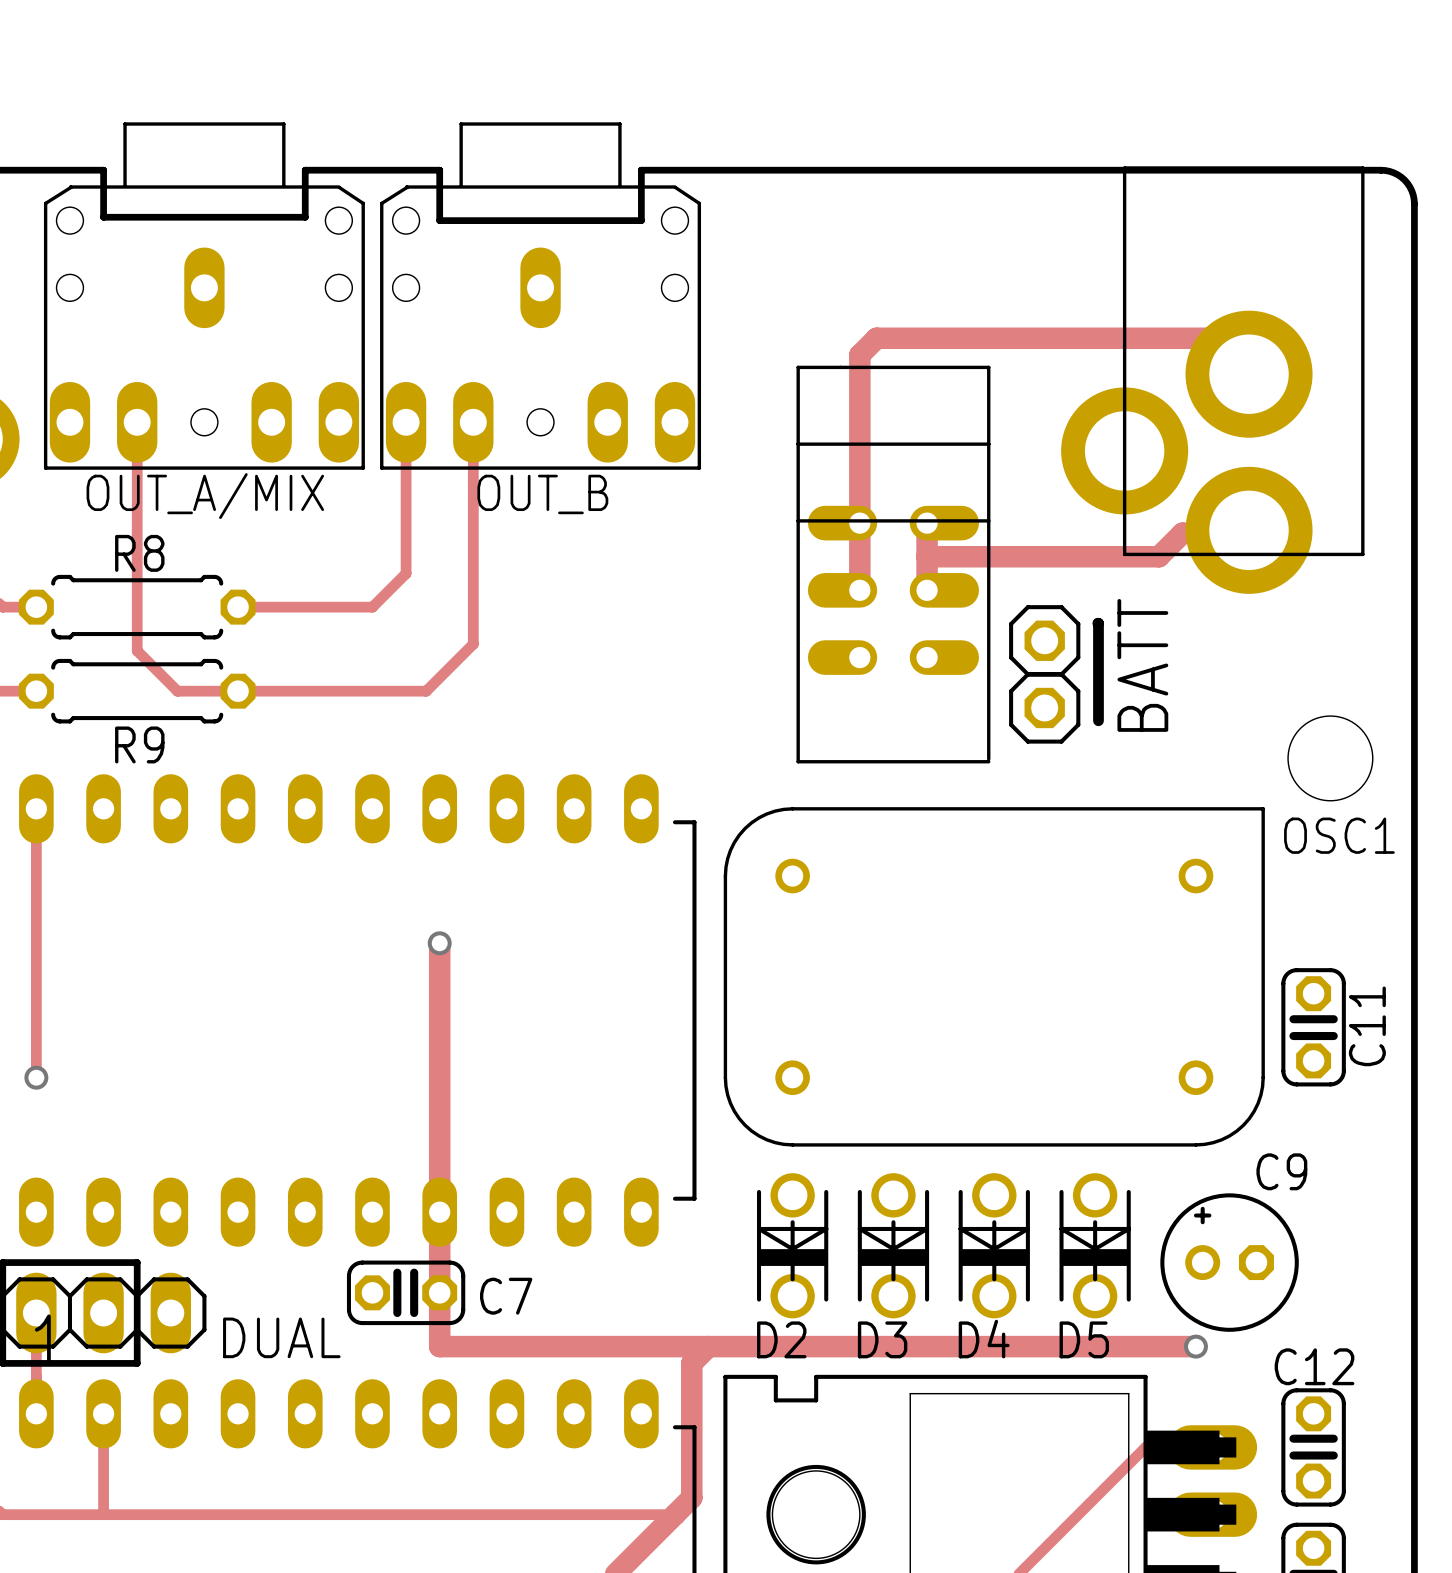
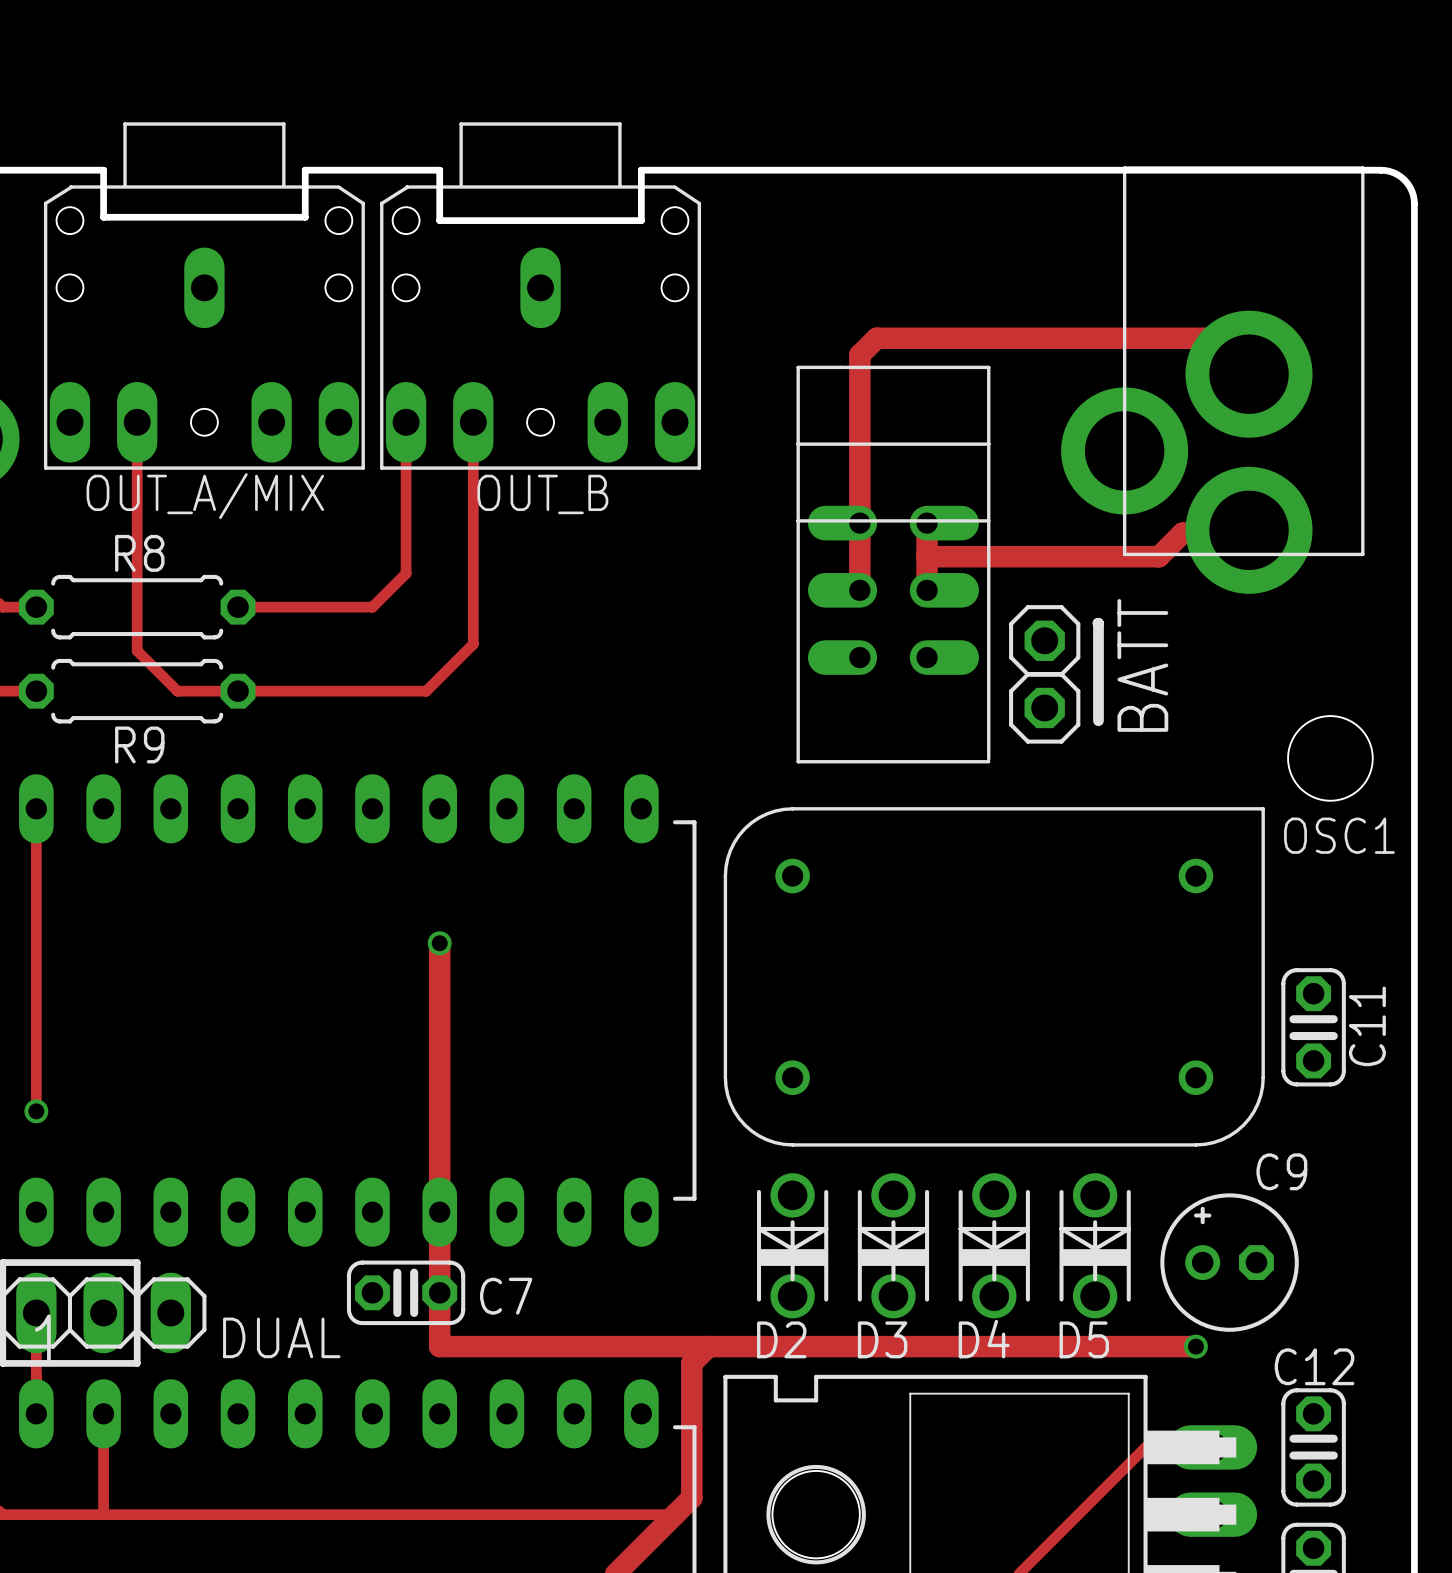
track: none -> (36, 1077) (36, 1111)
via position: (36, 1077) -> (36, 1111)

